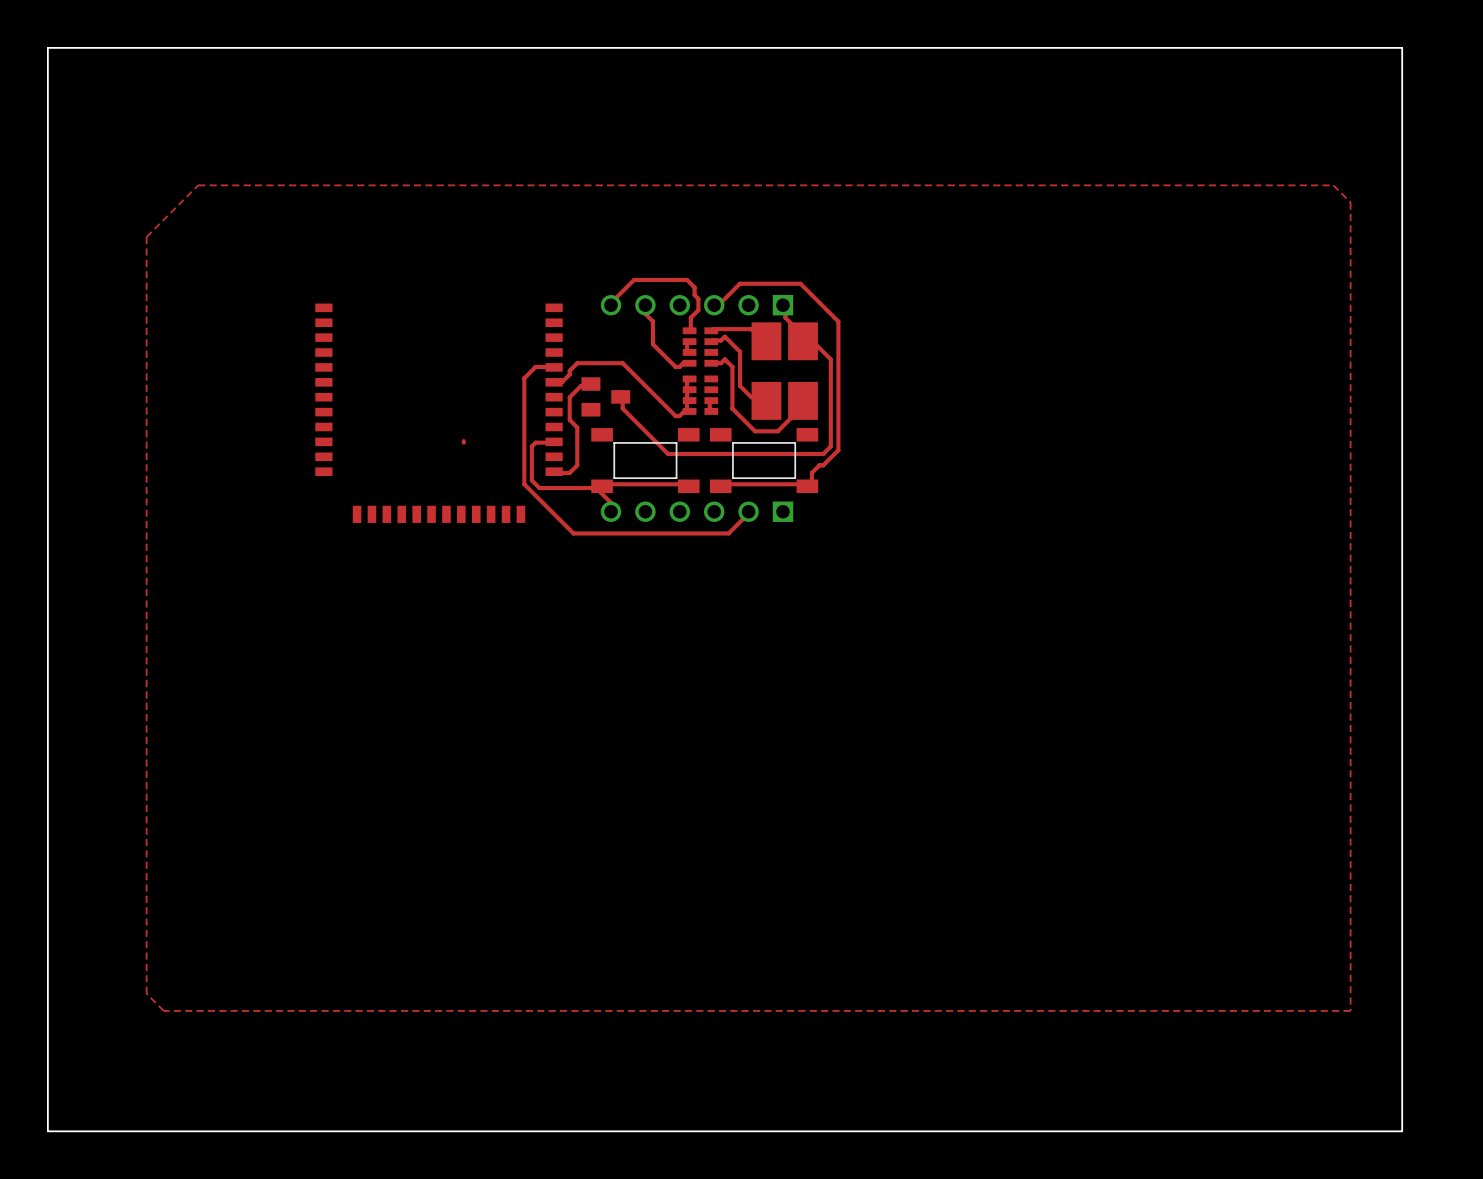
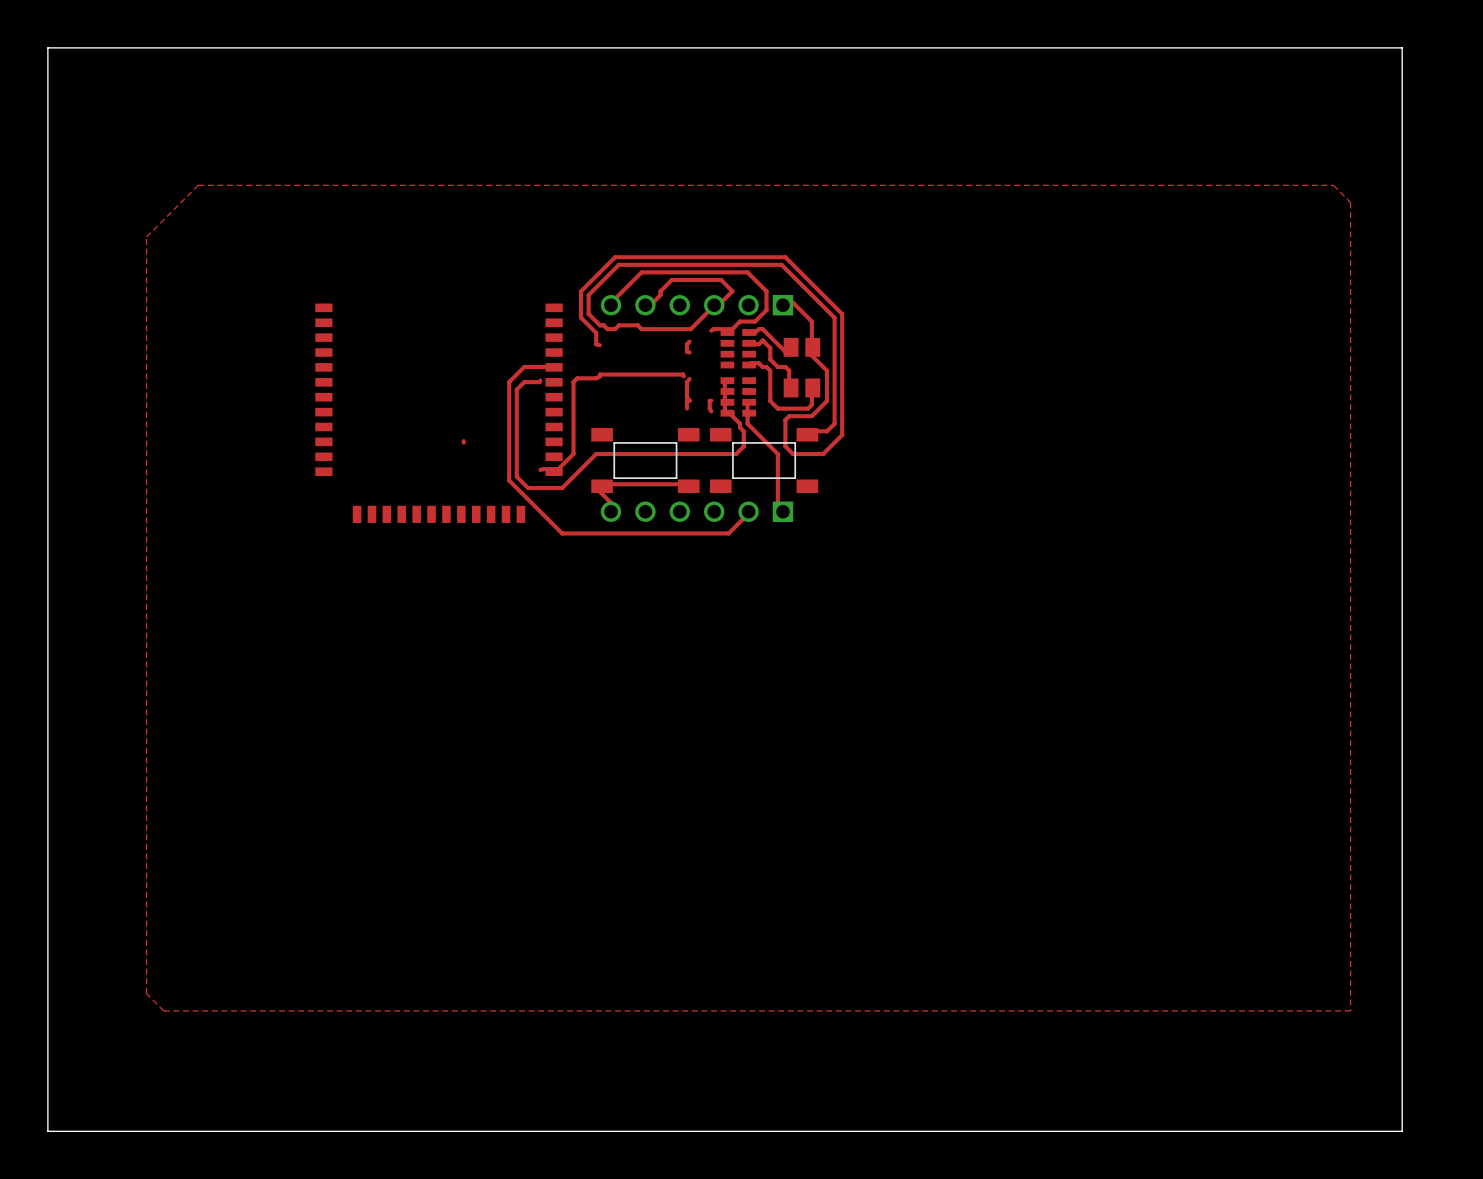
top track: (671, 279) (634, 279) -> (671, 279) (652, 302) (645, 302) (645, 305)
top track: (687, 279) (694, 287) (694, 295) (698, 298) (698, 310) (690, 317) (689, 330) -> (687, 279) (721, 279) (732, 291)
top track: (800, 283) (740, 283) (732, 291) -> (800, 283) (781, 264) (618, 264) (588, 295) (588, 314) (600, 325) (603, 325) (607, 329) (615, 329) (618, 325) (637, 325) (641, 329) (690, 329) (714, 305)
top track: (645, 305) (645, 314) (652, 321) (652, 344) (675, 366) (679, 366) (683, 363) (689, 363) -> none
top track: (783, 305) (785, 306) (785, 317) (800, 332) (800, 340) (804, 344) (815, 344) (830, 359) (830, 446) -> (783, 305) (785, 302) (792, 302) (811, 321) (811, 355) (827, 370) (827, 401) (811, 416) (789, 416) (785, 419) (785, 446) (792, 454)
top track: (834, 317) (838, 321) (838, 450) (823, 465) (819, 465) (811, 472) (811, 484) (808, 488) (804, 484) (721, 484) (720, 486) -> (834, 317) (834, 423) (827, 431) (808, 431) (807, 433)
top track: (732, 329) (751, 329) (762, 340) (766, 341) -> (732, 329) (740, 321) (755, 321) (766, 310) (766, 291) (747, 272) (641, 272) (634, 279)
top track: none -> (749, 332) (755, 332) (758, 329) (762, 329) (785, 351) (789, 351) (792, 348) (791, 347)
top track: (711, 341) (721, 340) (724, 336) (740, 351) (740, 385) (751, 397) (762, 397) (766, 400) -> none
top track: none -> (749, 343) (758, 344) (762, 340) (770, 348) (770, 359) (777, 366) (785, 366) (789, 370) (789, 385) (791, 387)
top track: none -> (599, 345) (596, 344) (596, 332) (581, 317) (581, 291) (615, 257) (785, 257) (842, 314) (842, 435) (830, 446)
part: (700, 347) -> none
part: none -> (738, 348)
top track: (711, 363) (721, 363) (724, 359) (732, 366) (732, 408) (747, 423) -> (749, 402) (747, 423)
top track: none -> (749, 365) (758, 363) (770, 370) (770, 401) (777, 408) (808, 408) (811, 404) (812, 387)
top track: (535, 366) (524, 378) (524, 484) -> (540, 380) (524, 382) (516, 389) (516, 476) (524, 484)
part: none -> (801, 367)
part: (784, 371) -> none
top track: none -> (683, 376) (683, 374) (600, 374) (596, 378) (577, 378) (573, 382) (573, 454) (558, 469) (540, 469)
top track: (554, 382) (562, 382) (577, 363) (622, 363) (675, 416) (679, 416) (687, 408) (689, 411) -> none
top track: (590, 384) (581, 385) (569, 397) (569, 419) (577, 427) (577, 465) (569, 472) (554, 471) -> none
part: (700, 395) -> none
part: (605, 396) -> none
top track: (620, 396) (622, 397) (622, 408) (668, 454) -> none
part: none -> (738, 396)
top track: (803, 400) (800, 401) (800, 408) (777, 431) (755, 431) -> (783, 511) (777, 506) (777, 454) (755, 431)
top track: (554, 441) (535, 442) (531, 446) (531, 480) (539, 488) -> (528, 488) (539, 488)
top track: (792, 454) (736, 454) -> (727, 380) (724, 382) (724, 389) (727, 391) (724, 393) (724, 401) (727, 402) (724, 404) (724, 412) (732, 412) (732, 416) (740, 423) (740, 427) (743, 431) (743, 446) (736, 454)
top track: (602, 486) (600, 488) (562, 488) -> (668, 454) (596, 454) (562, 488)
top track: (528, 488) (573, 533) -> (535, 366) (524, 366) (509, 382) (509, 480) (562, 533) (573, 533)

